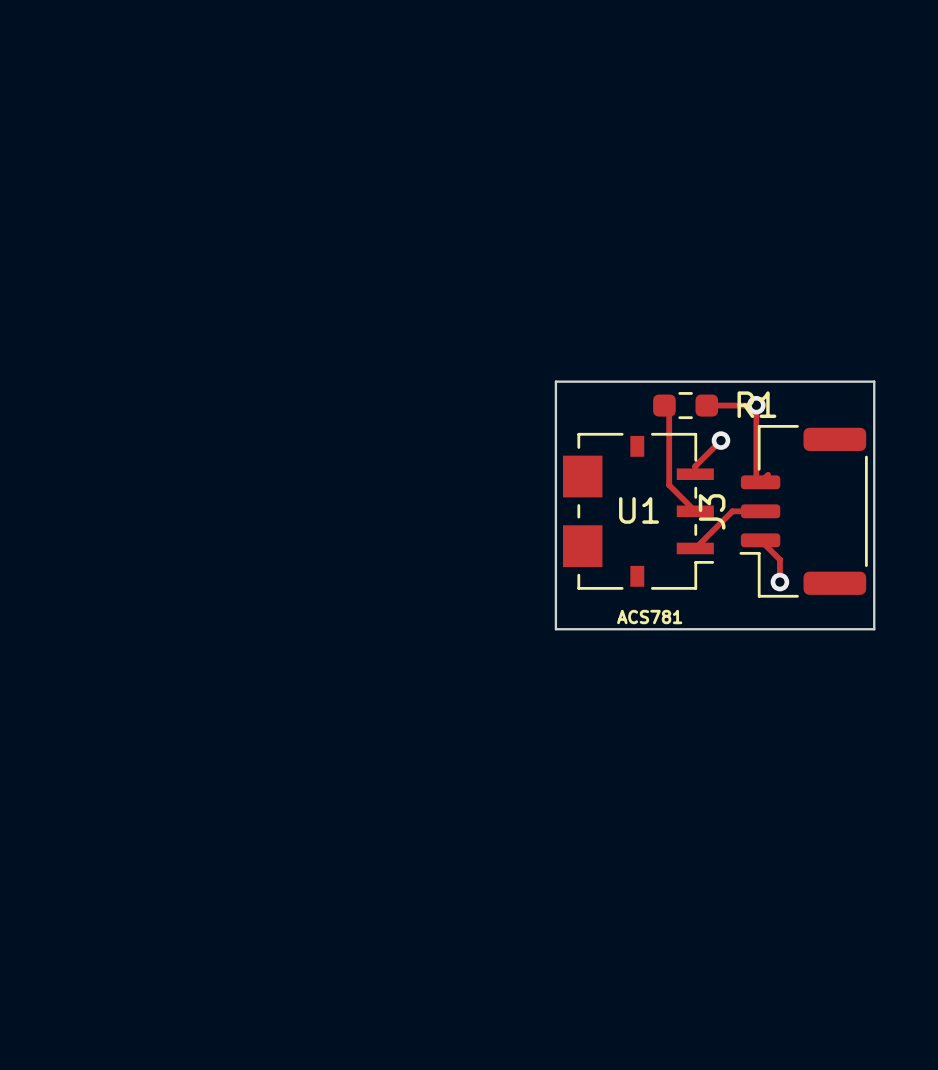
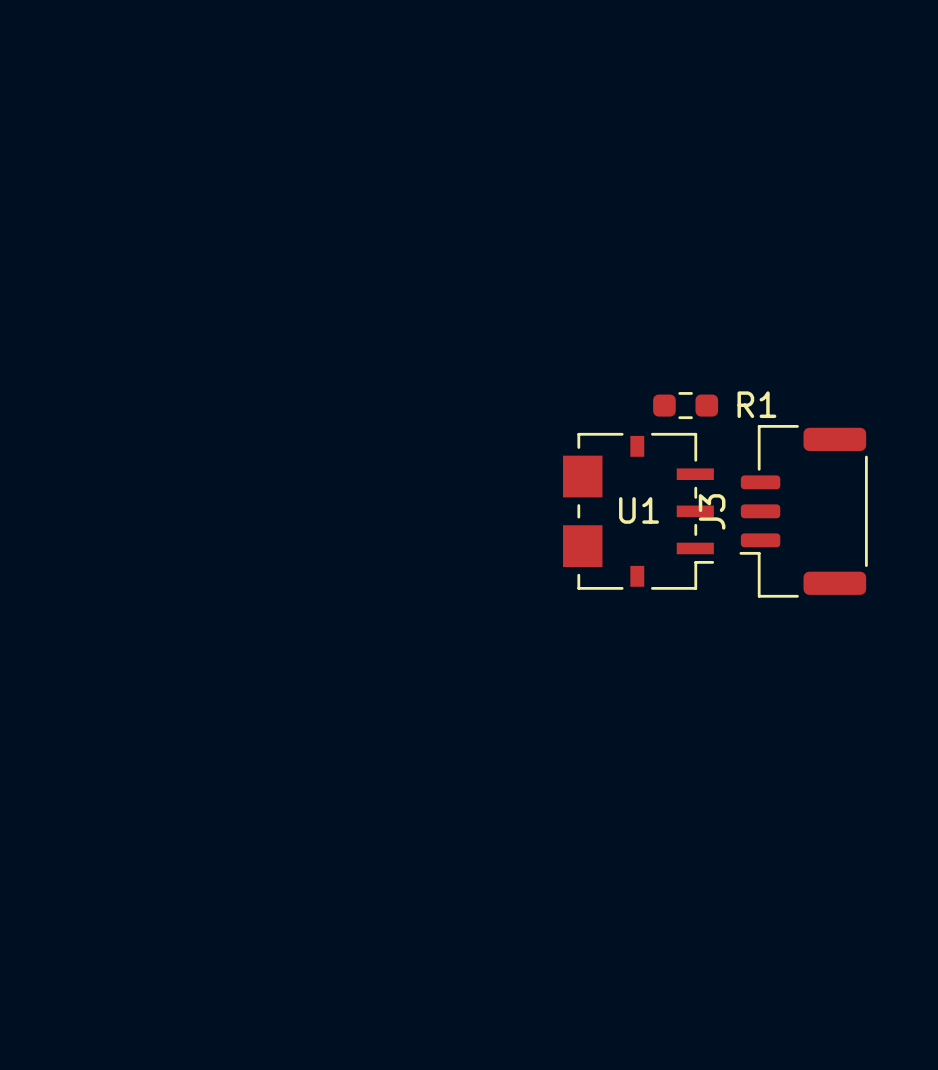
board edge: (555, 381) (874, 381) (874, 629) (555, 629) (555, 381) -> none
track: (669, 400) (669, 485) (695, 511) -> none
track: (706, 405) (756, 405) (756, 478) (760, 482) (768, 474) -> none
via: (756, 405) -> none
track: (720, 440) (695, 466) (695, 474) -> none
via: (720, 440) -> none
track: (760, 511) (732, 511) (695, 548) -> none
track: (760, 540) (779, 559) (779, 582) -> none
via: (779, 582) -> none
text: ACS781 (649, 617) -> none

